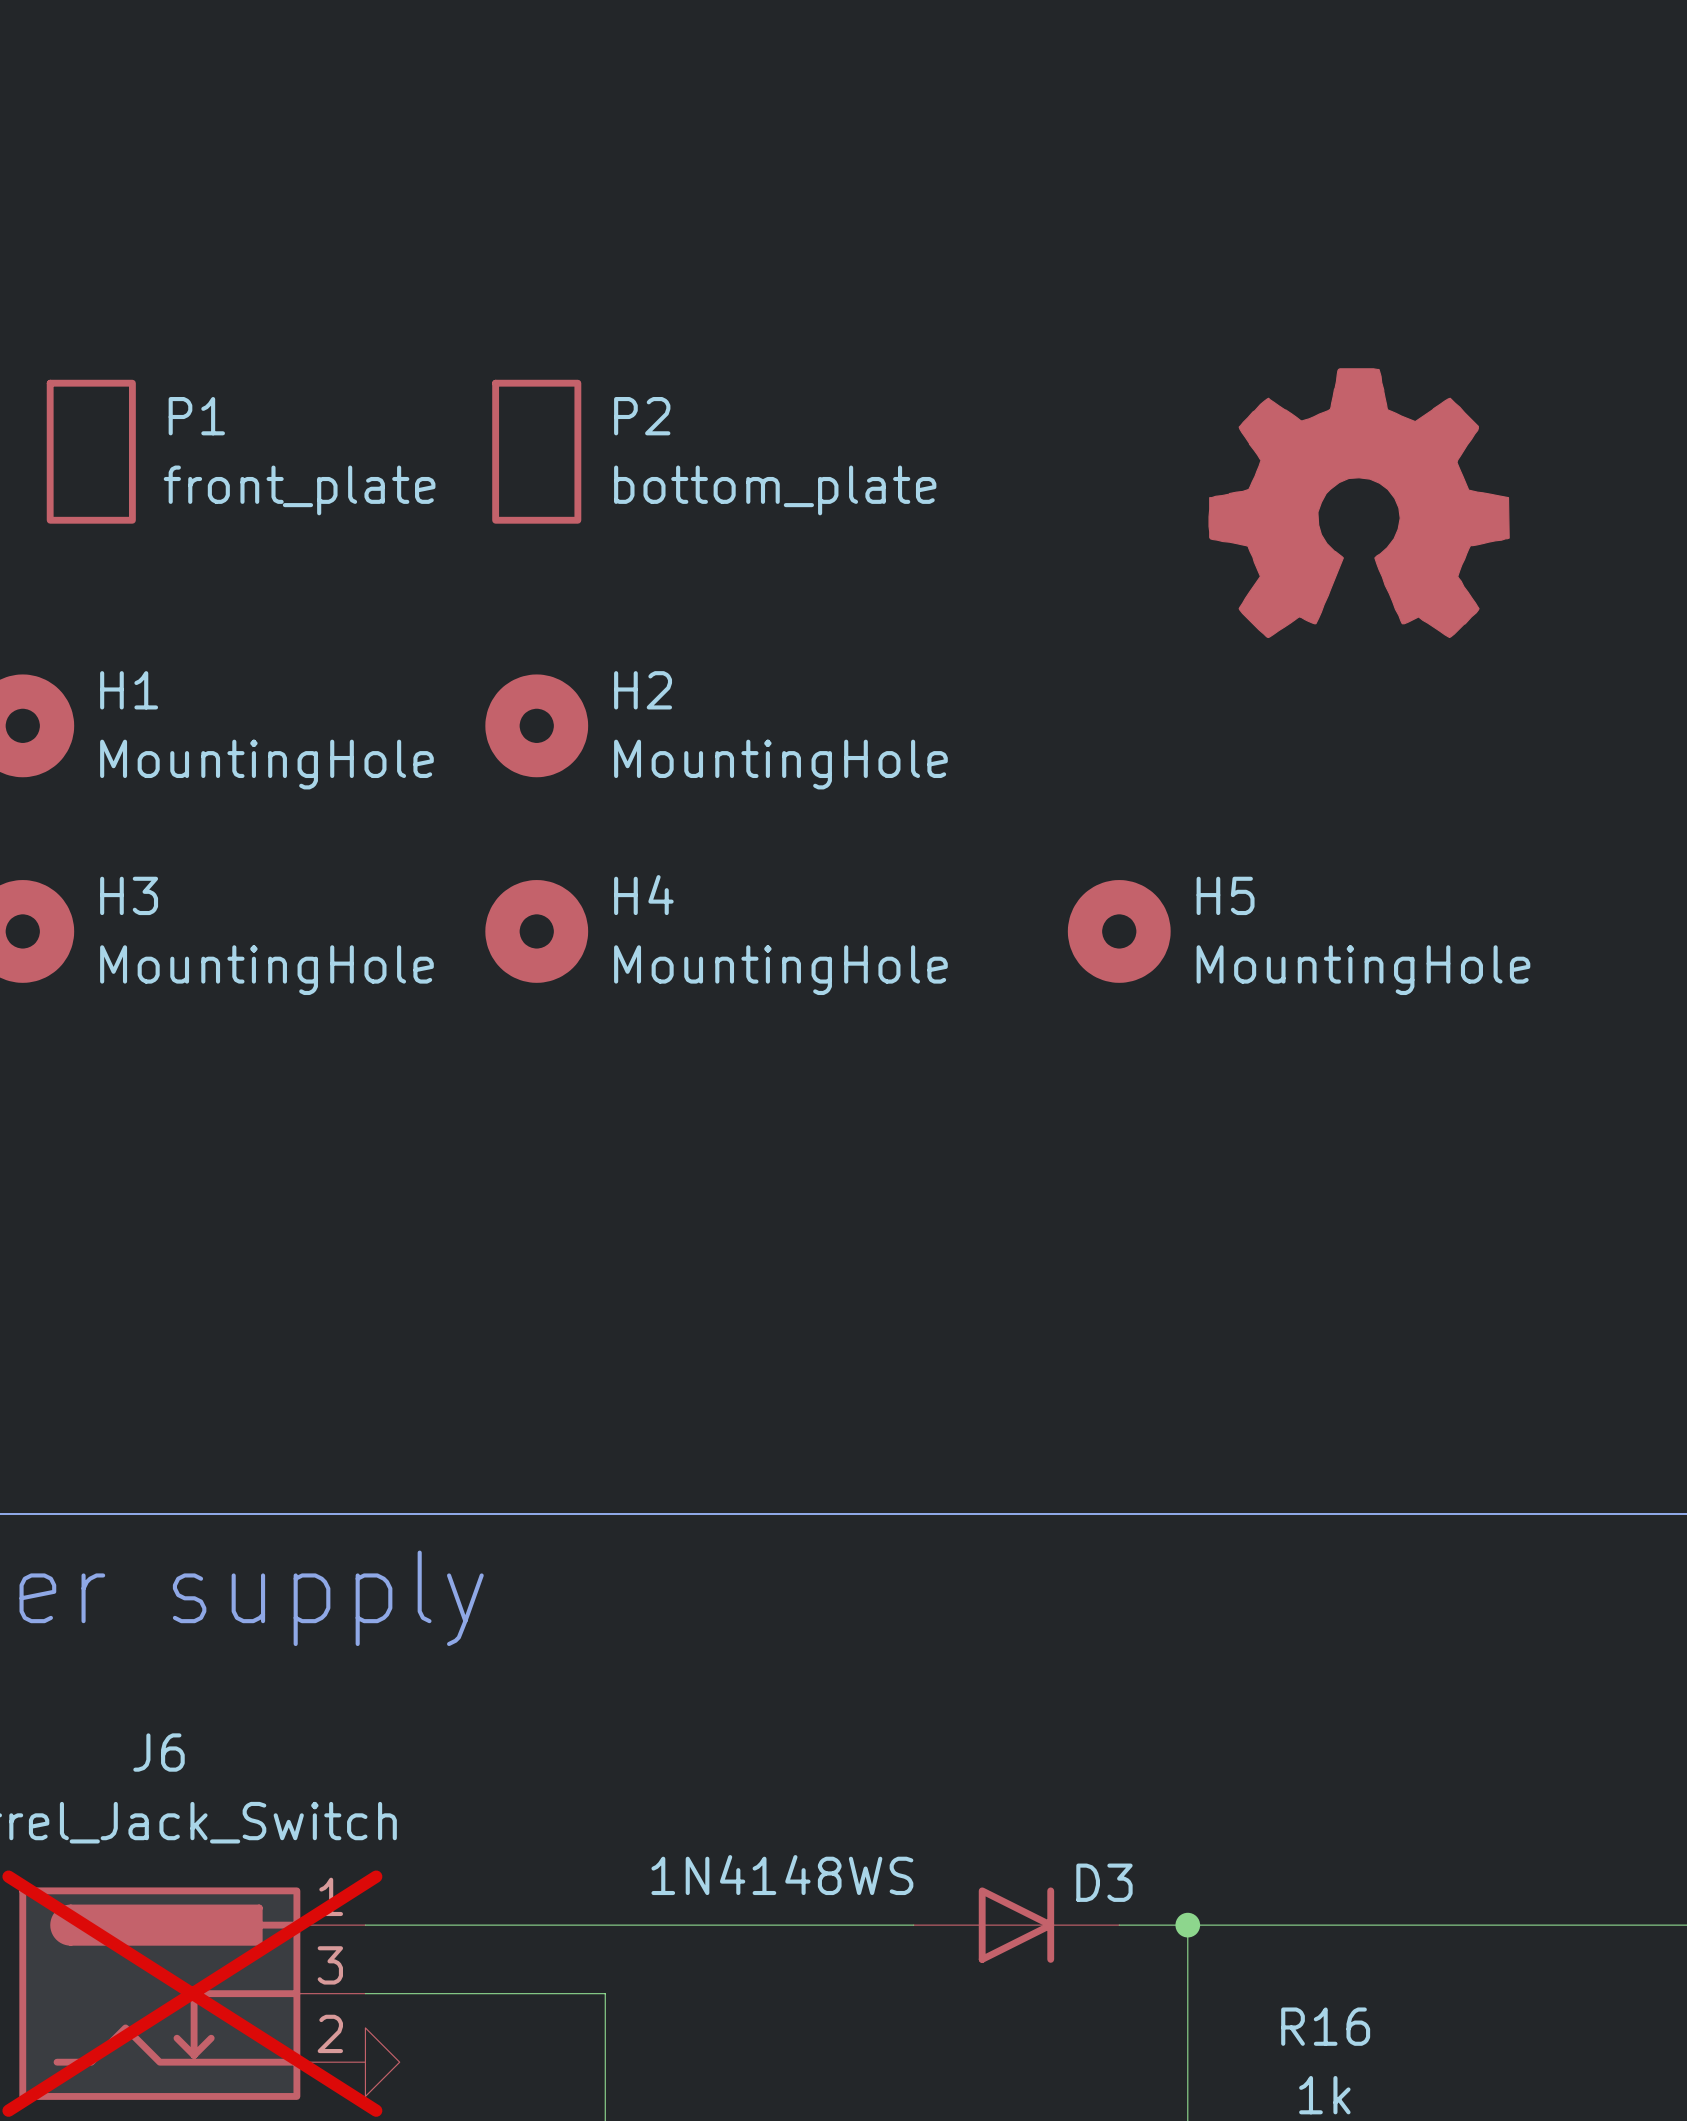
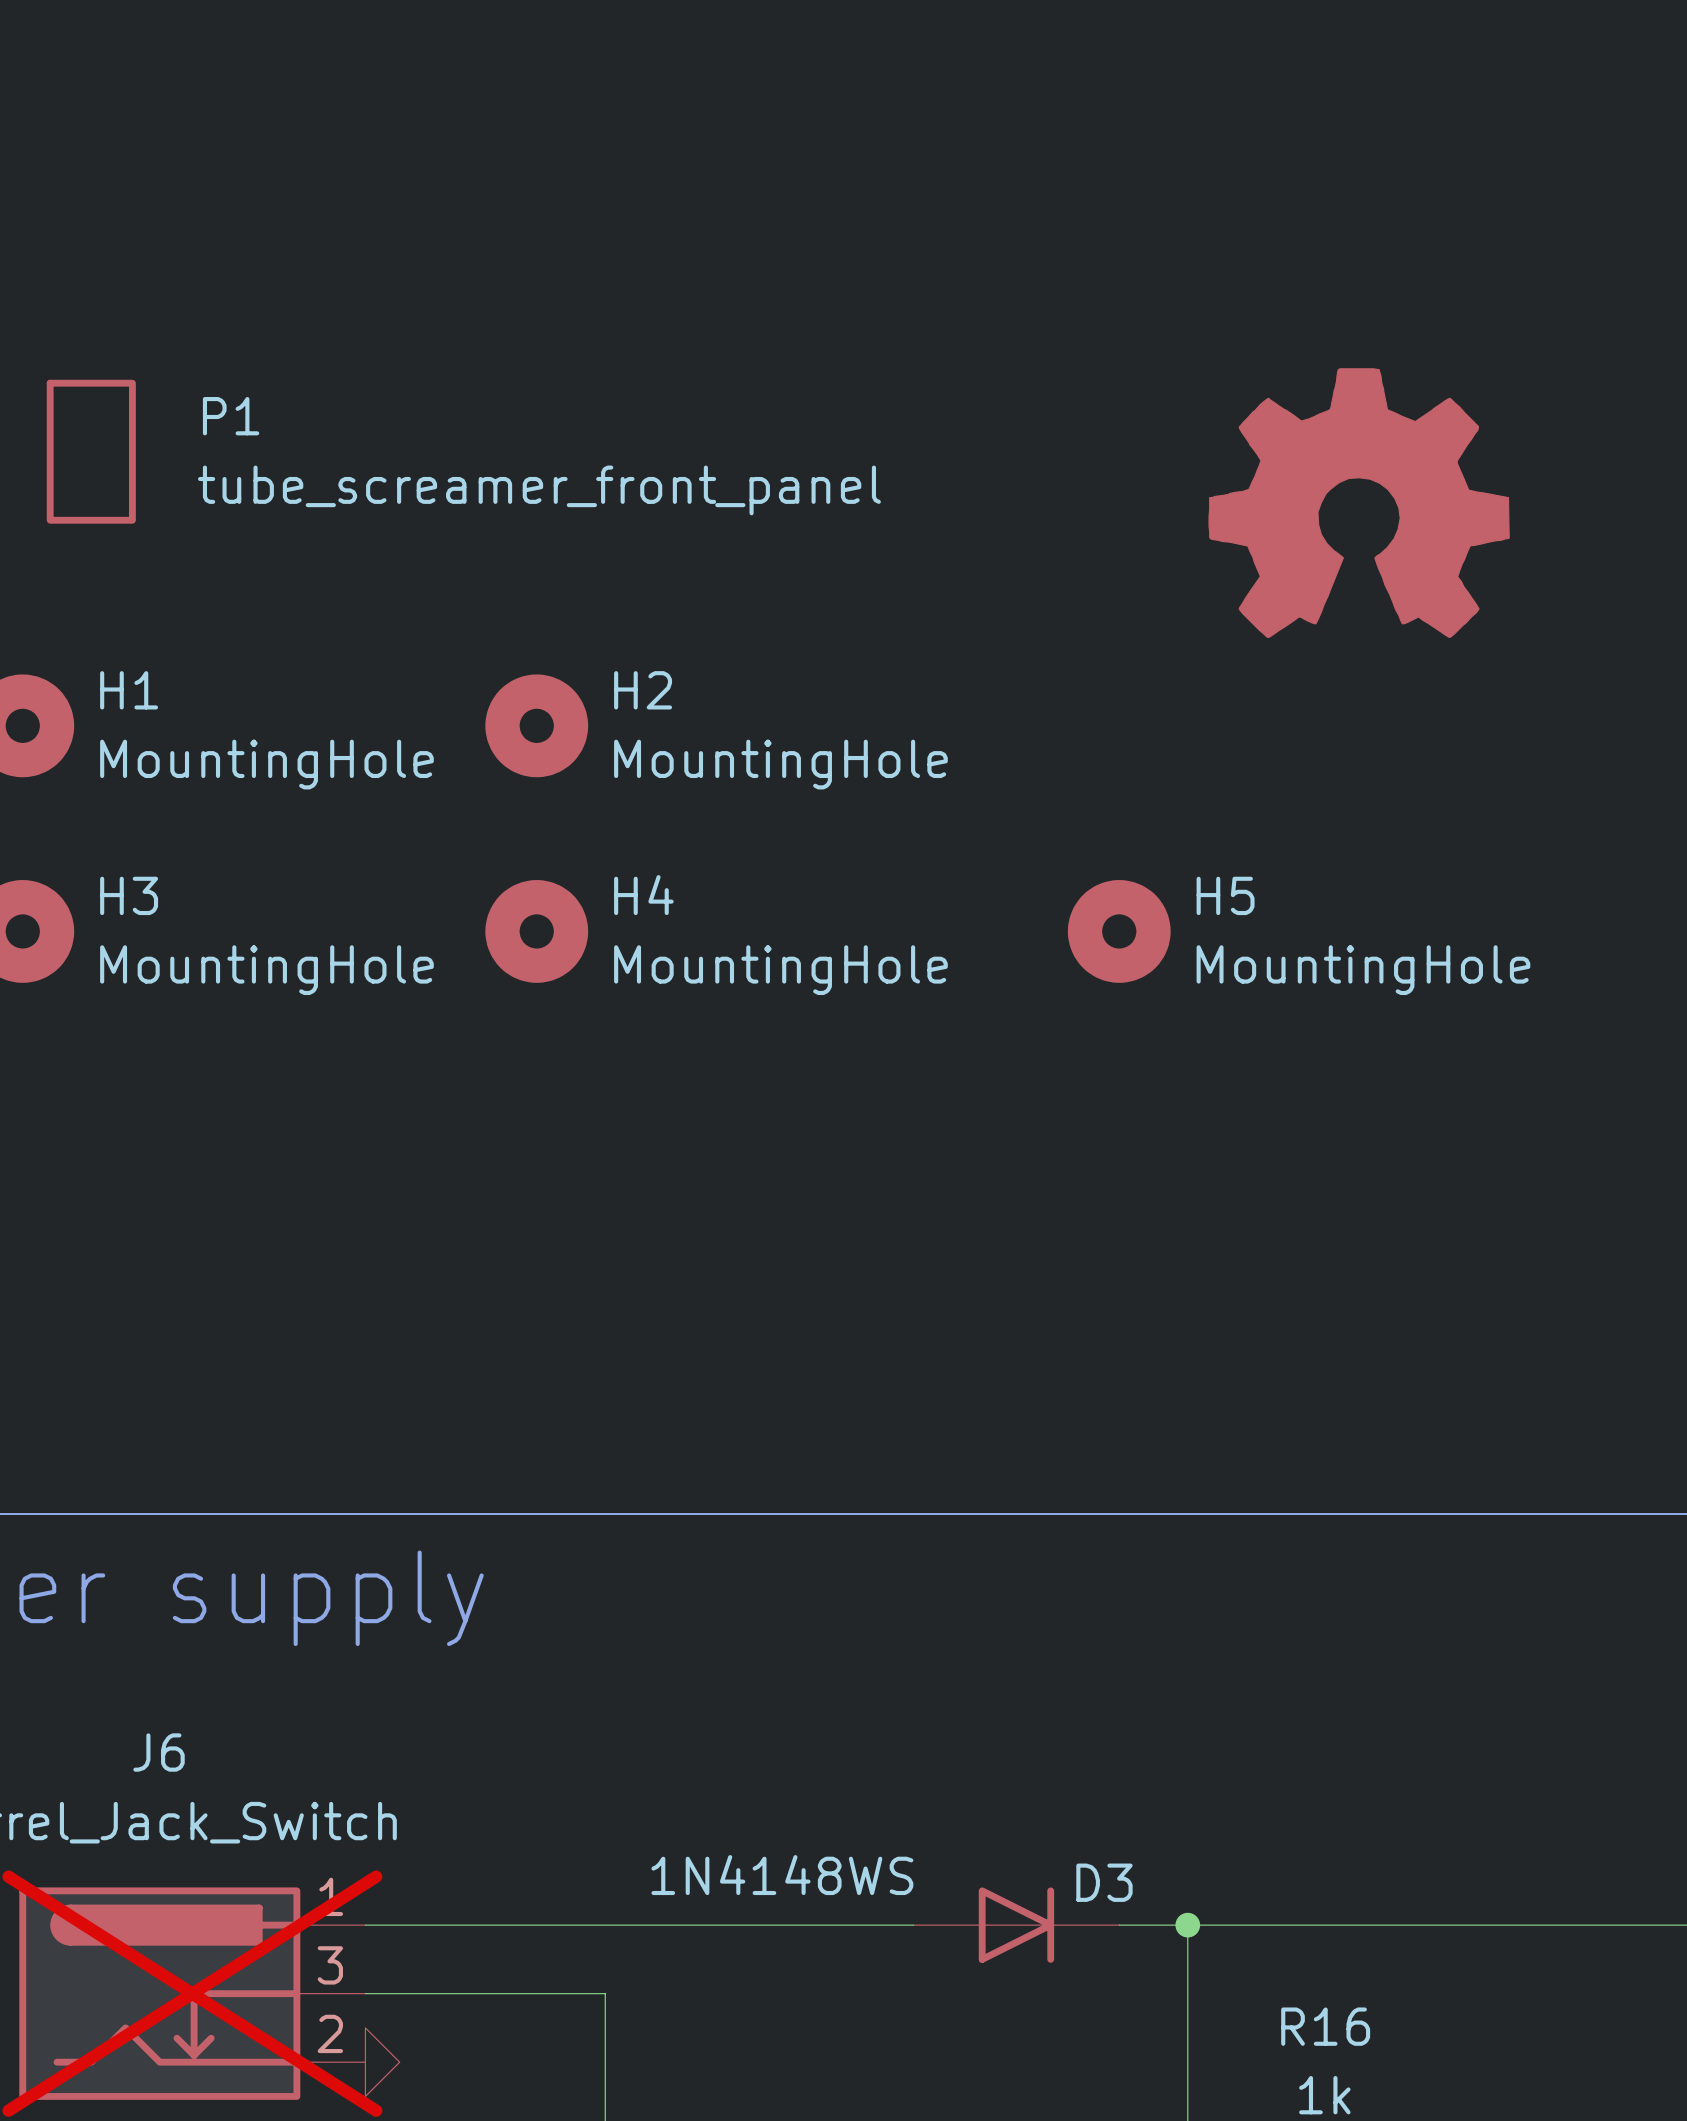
P1 name position: P1 (196, 416) -> P1 (231, 416)
P2: bottom_plate (536, 451) -> none
P1 value: front_plate (299, 490) -> tube_screamer_front_panel (539, 490)

